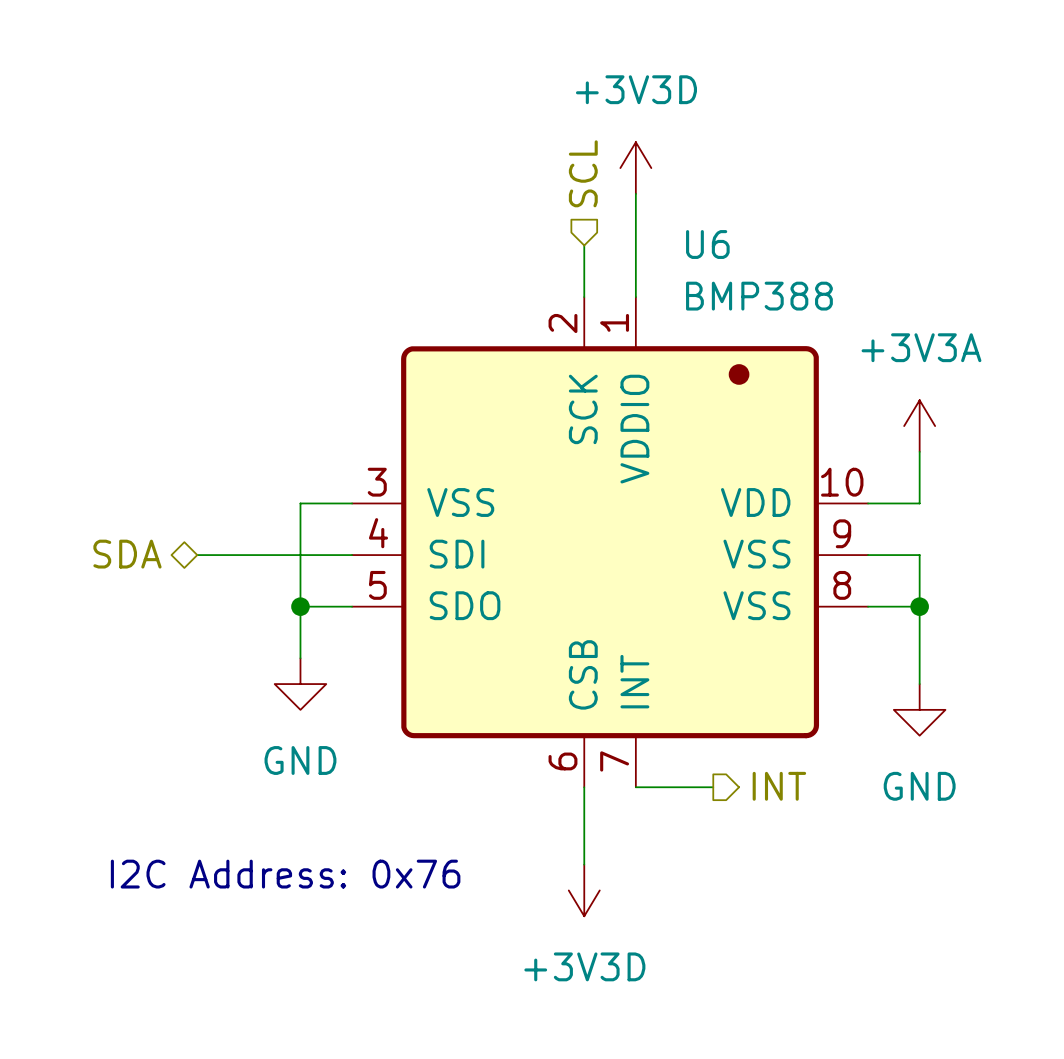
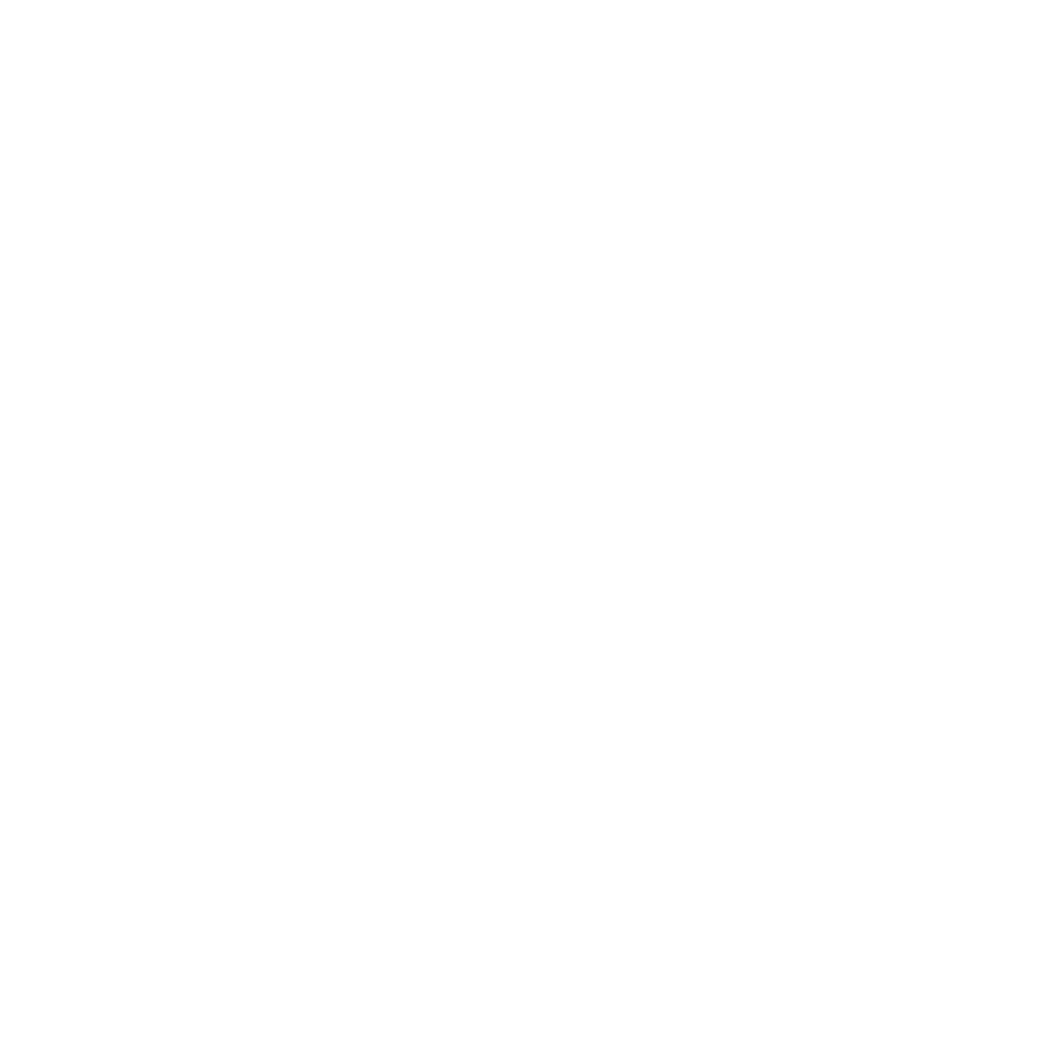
power symbol: +3V3D (635, 168) -> none
hierarchical label: SCL (583, 173) -> none
wire: (635, 193) (635, 297) -> none
wire: (584, 245) (584, 297) -> none
power symbol: +3V3A (919, 426) -> none
wire: (919, 451) (919, 503) (868, 503) -> none
wire: (352, 503) (300, 503) (300, 658) -> none
U6: BMP388 (610, 542) -> none
hierarchical label: SDA (127, 554) -> none
wire: (197, 555) (352, 555) -> none
wire: (868, 555) (919, 555) (919, 684) -> none
wire: (300, 606) (352, 606) -> none
junction: (300, 606) -> none
wire: (868, 606) (919, 606) -> none
junction: (919, 606) -> none
power symbol: GND (300, 684) -> none
power symbol: GND (919, 709) -> none
hierarchical label: INT (779, 786) -> none
wire: (584, 787) (584, 864) -> none
wire: (635, 787) (713, 787) -> none
text: I2C Address: 0x76 (285, 874) -> none
power symbol: +3V3D (584, 890) -> none

